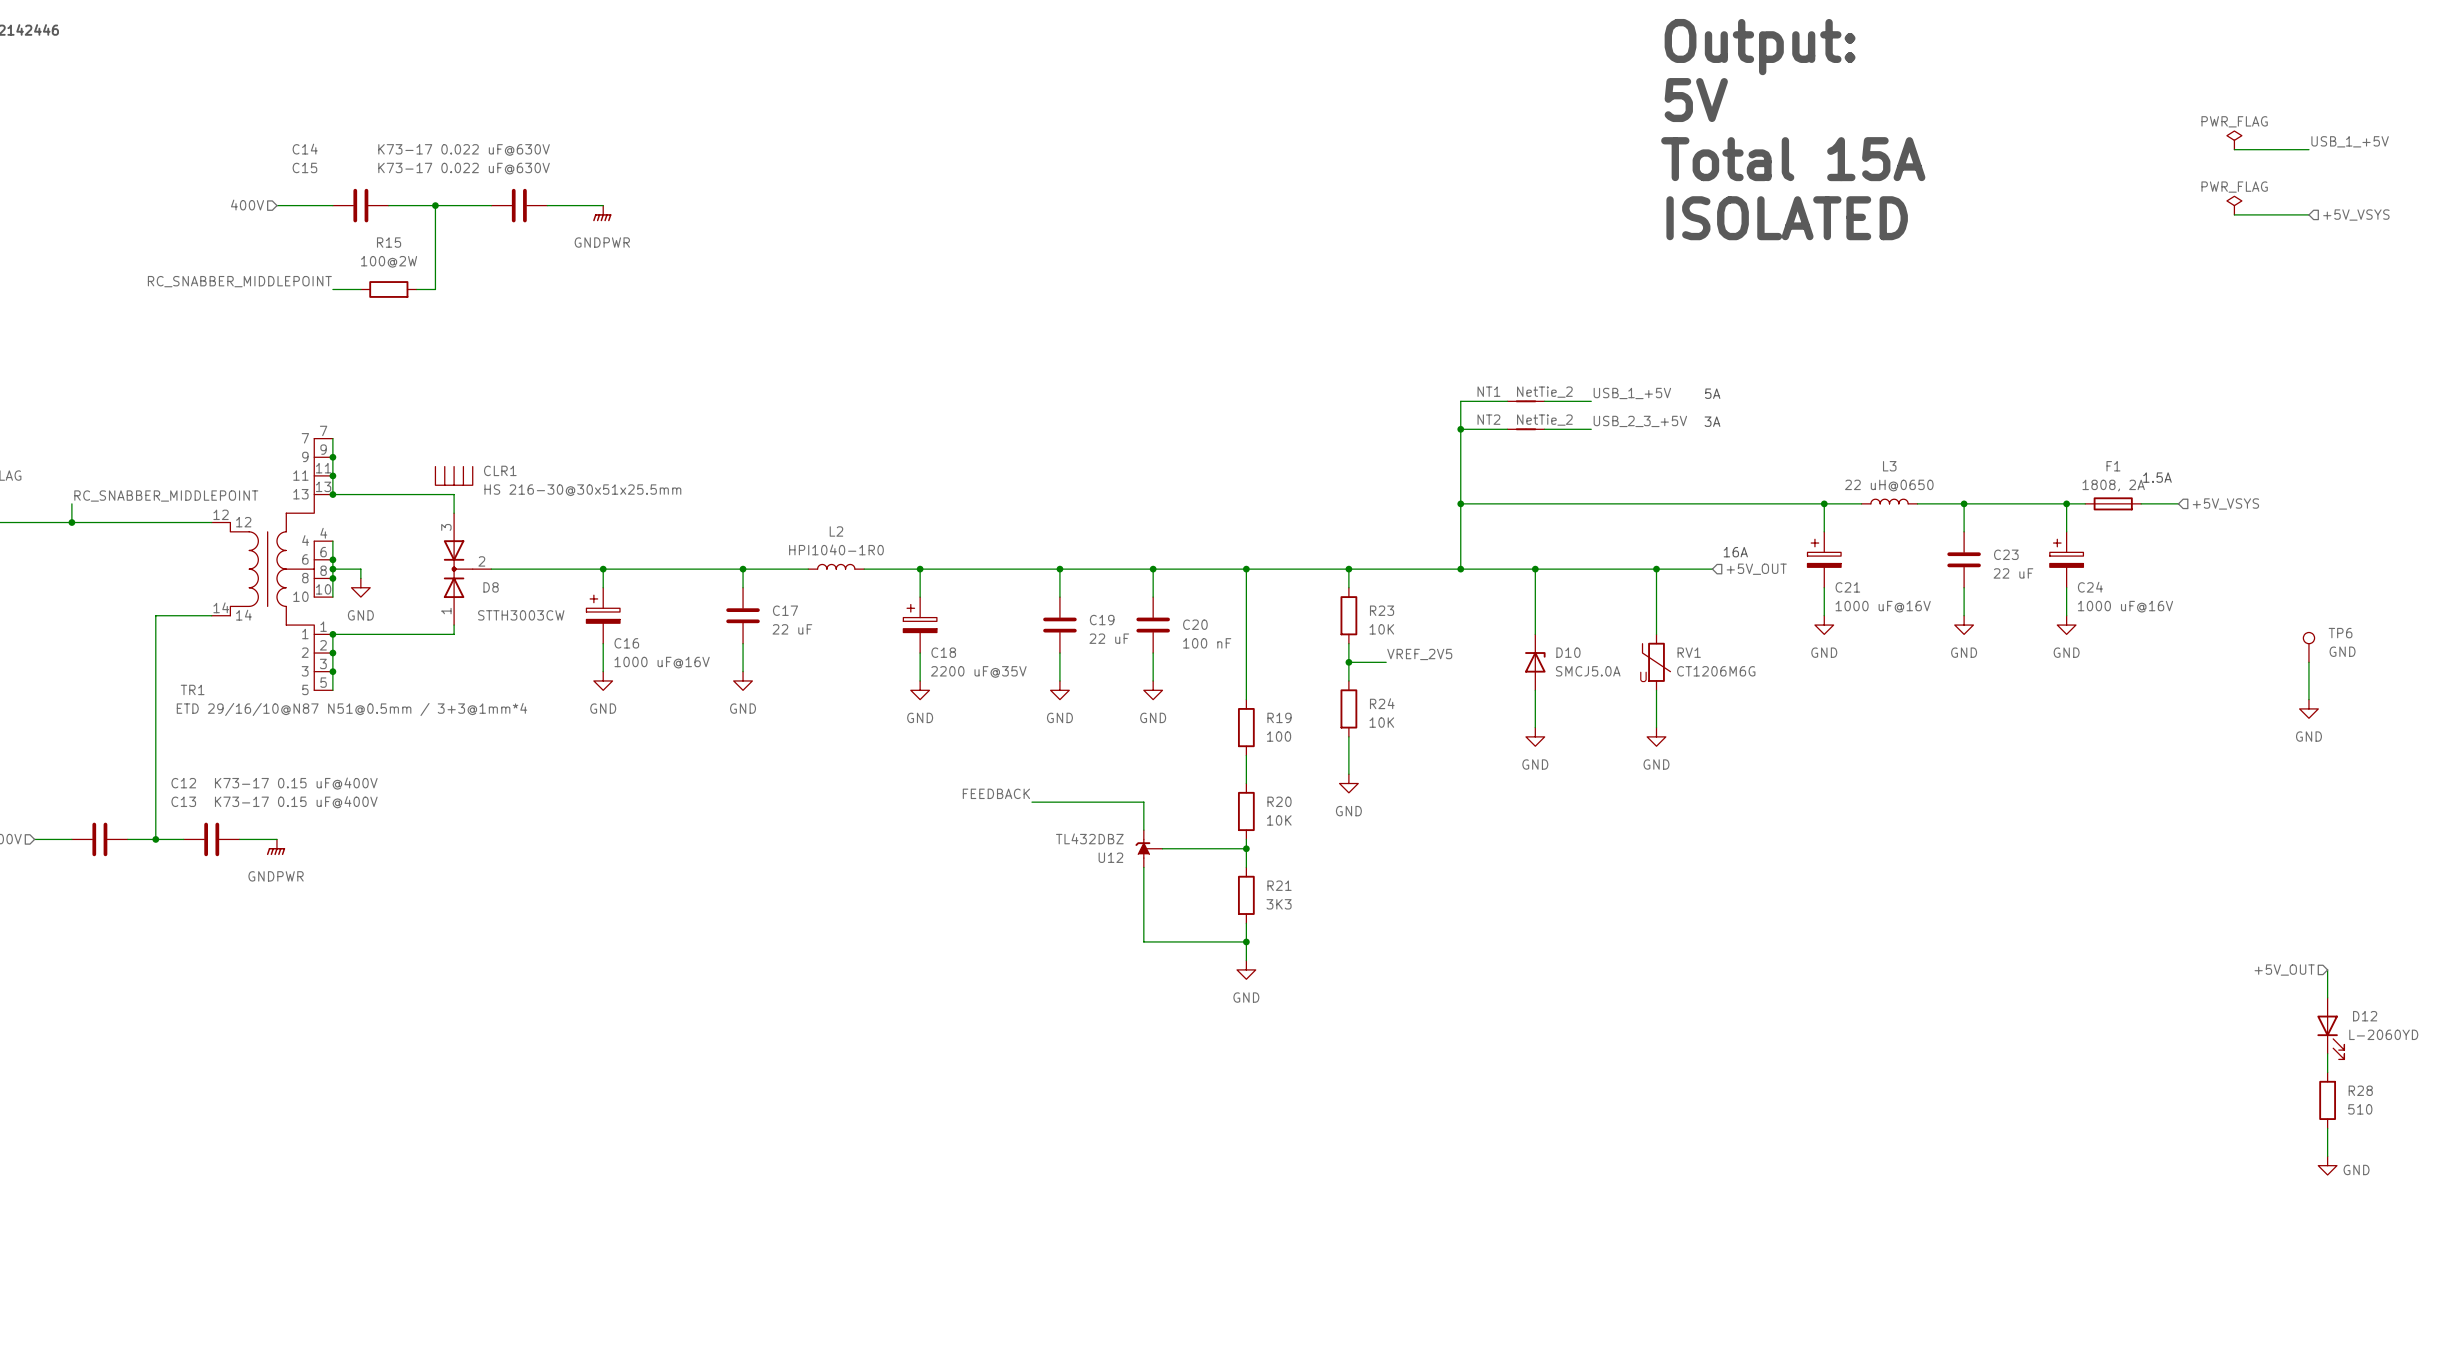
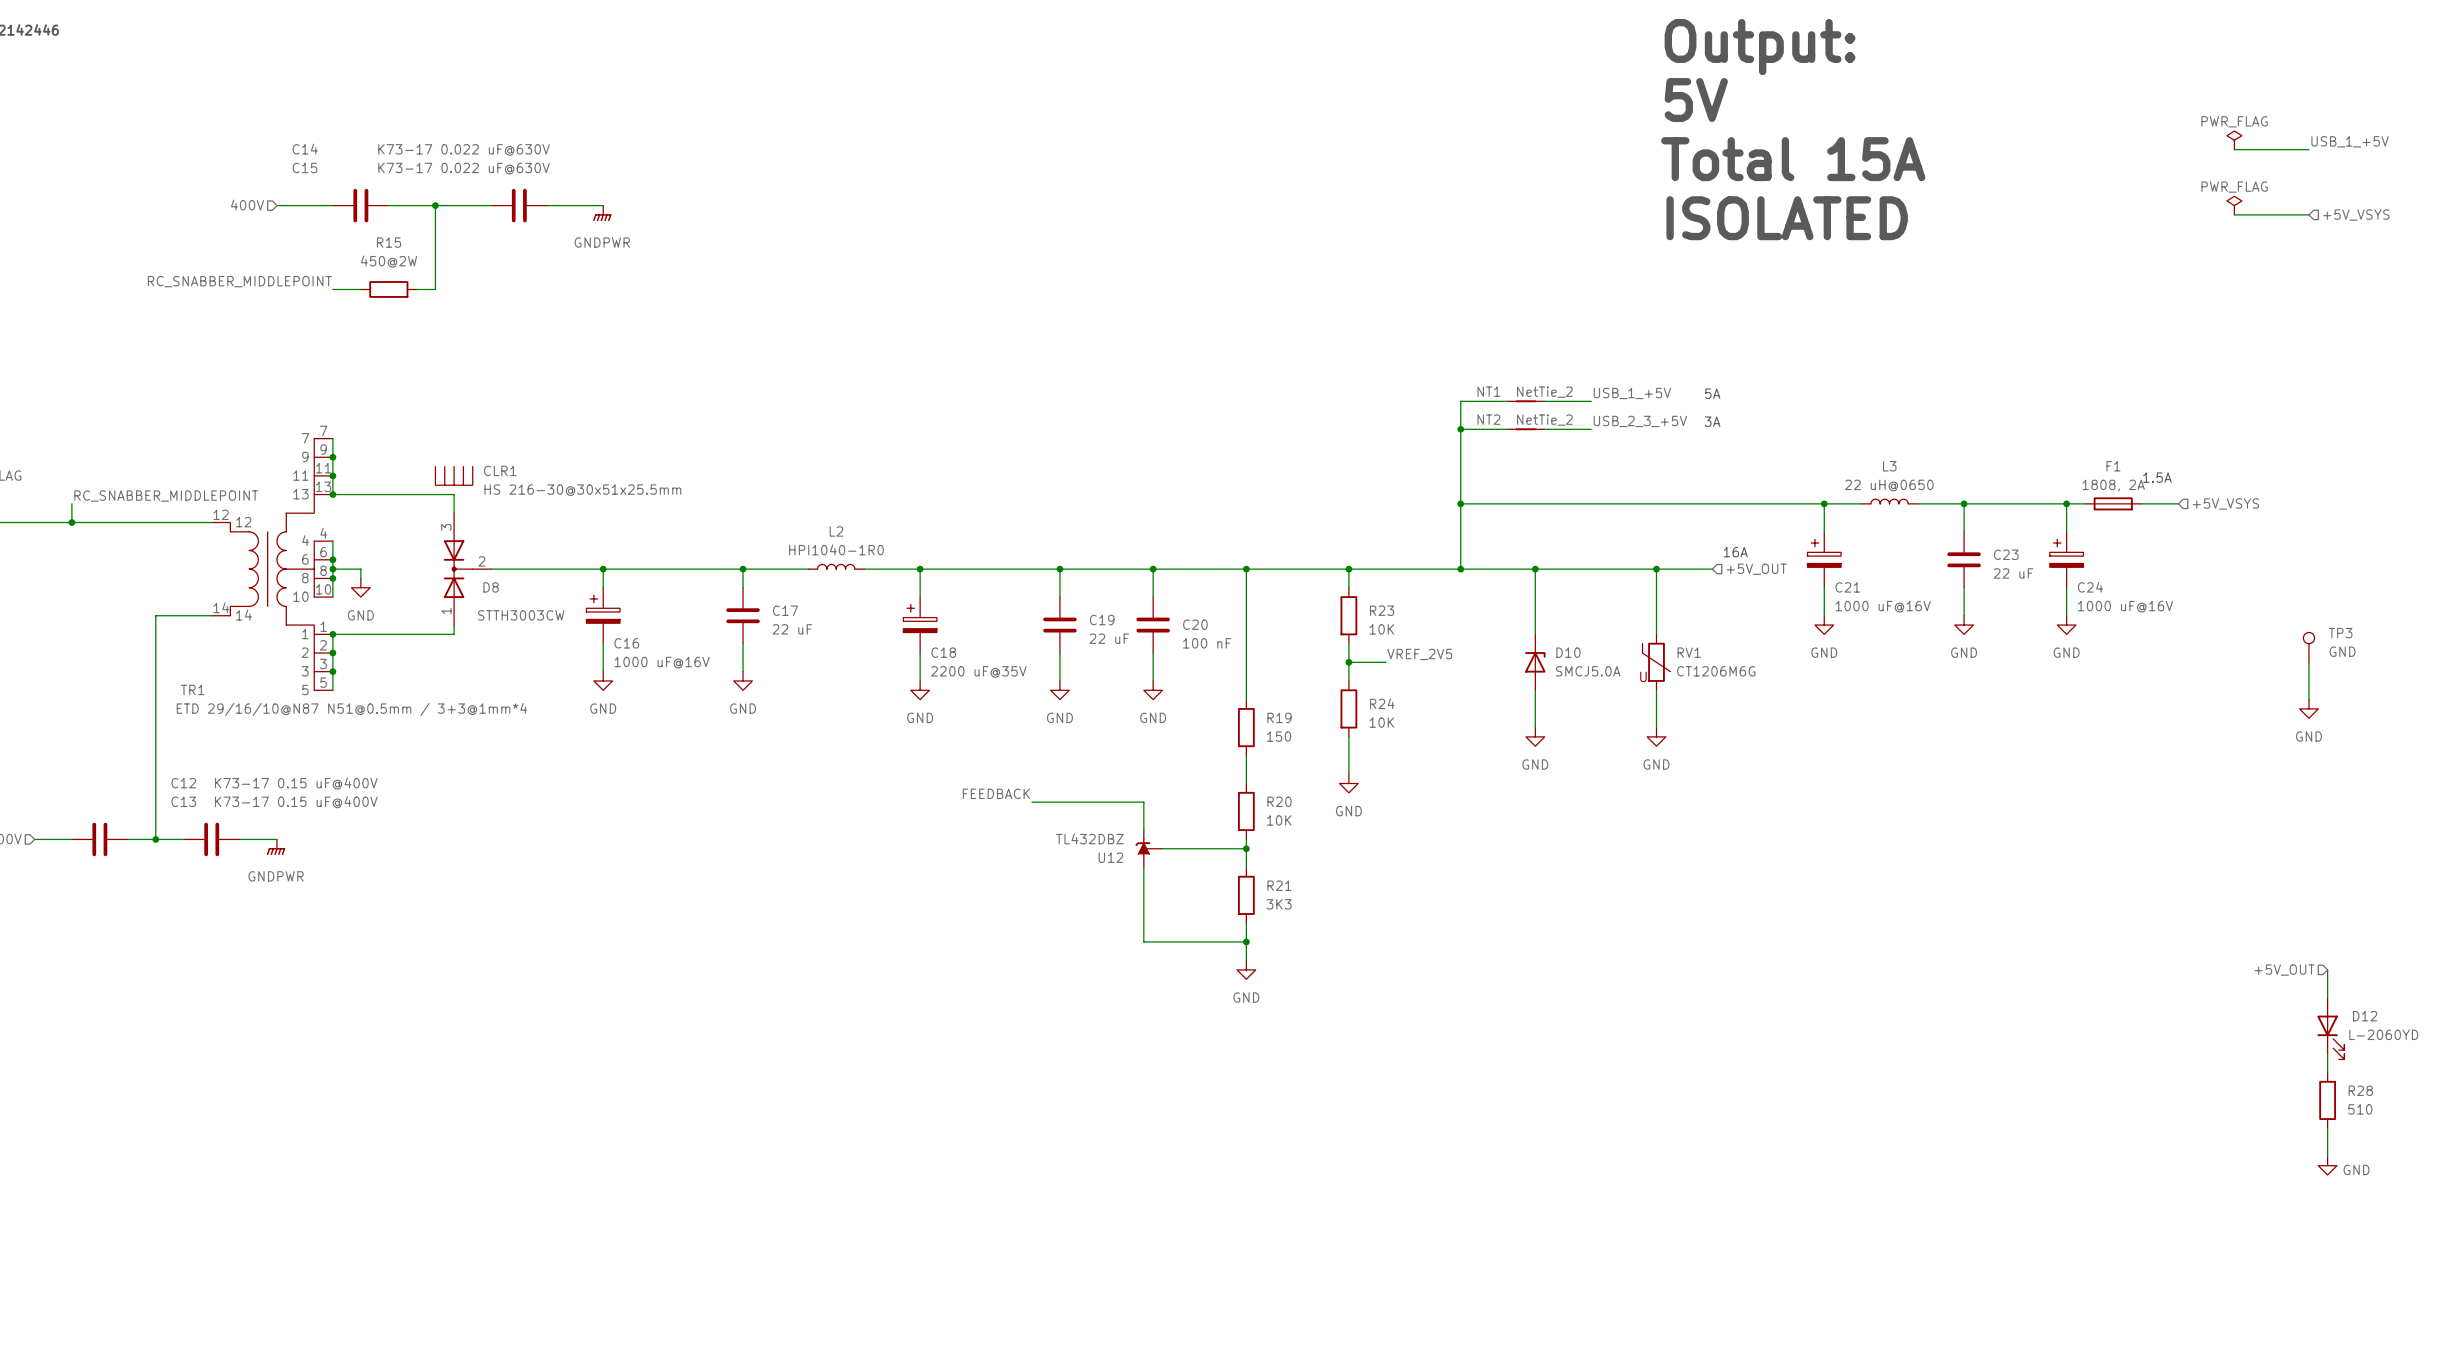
R15 value: 100@2W (389, 261) -> 450@2W (389, 261)
TP6 name: TP6 (2340, 633) -> TP3 (2340, 633)
R19 value: 100 (1279, 736) -> 150 (1279, 736)

